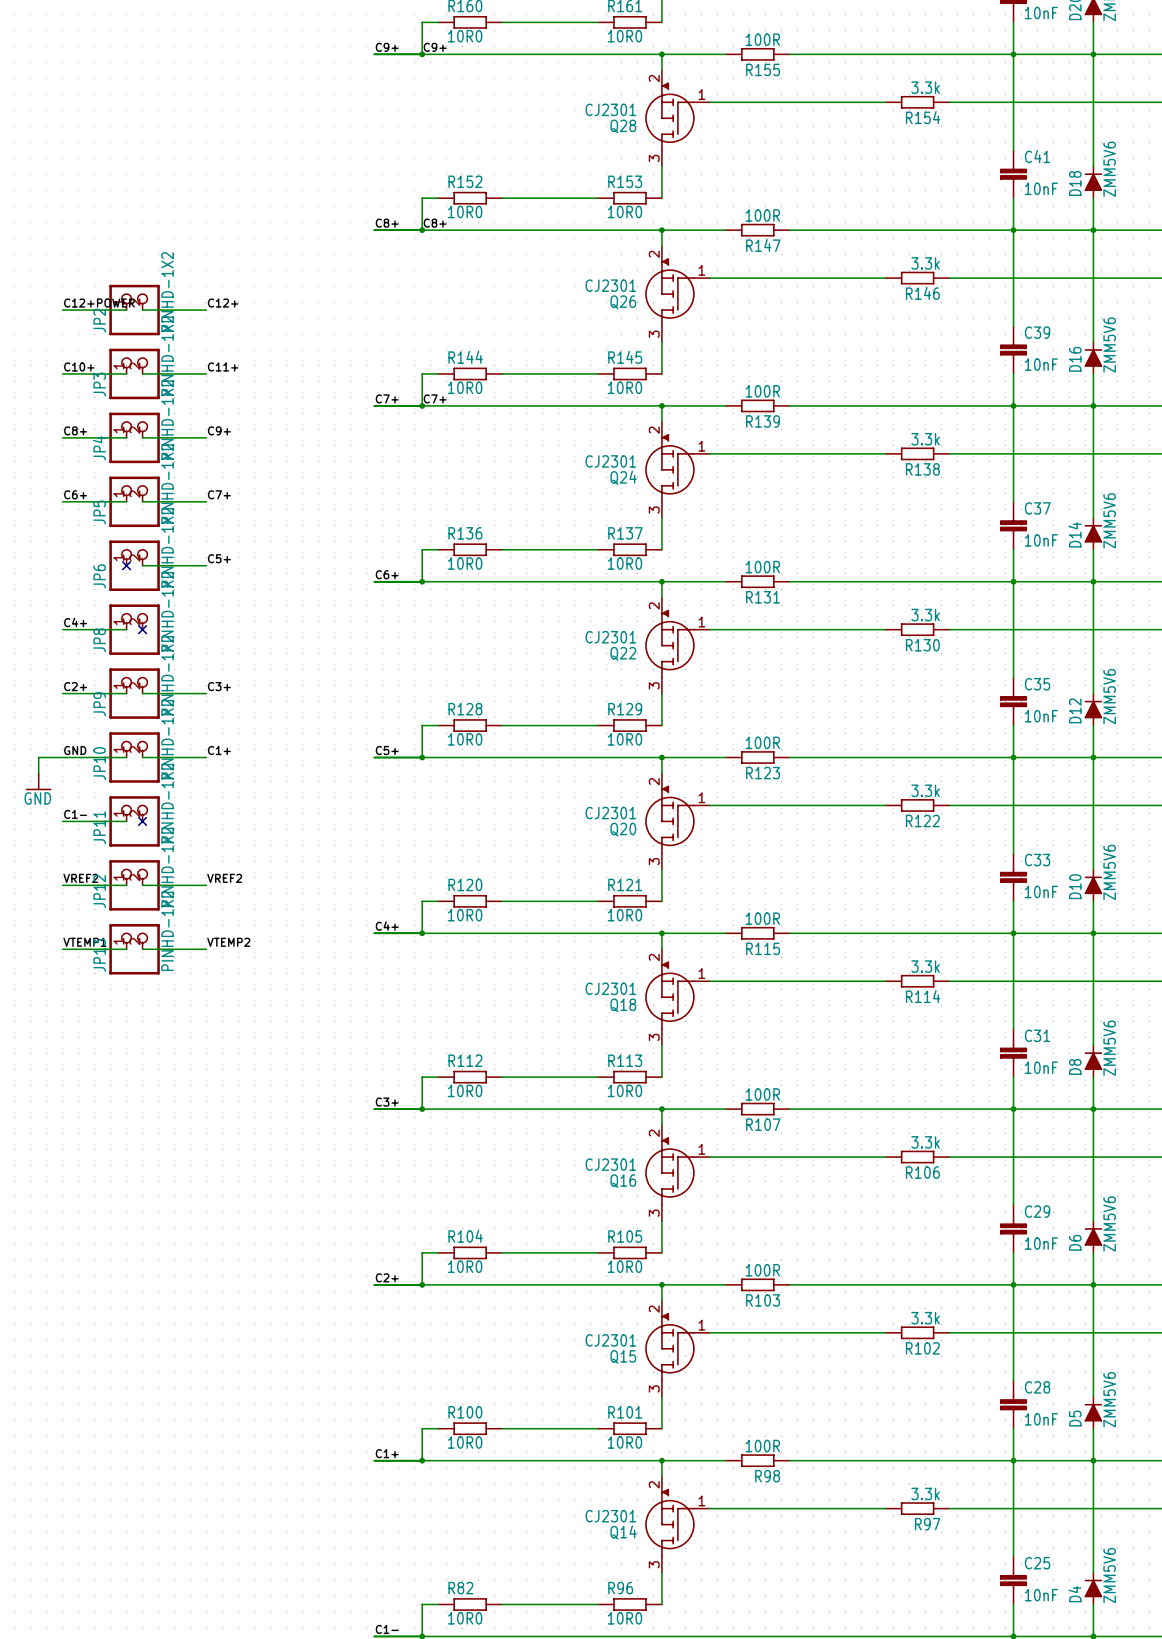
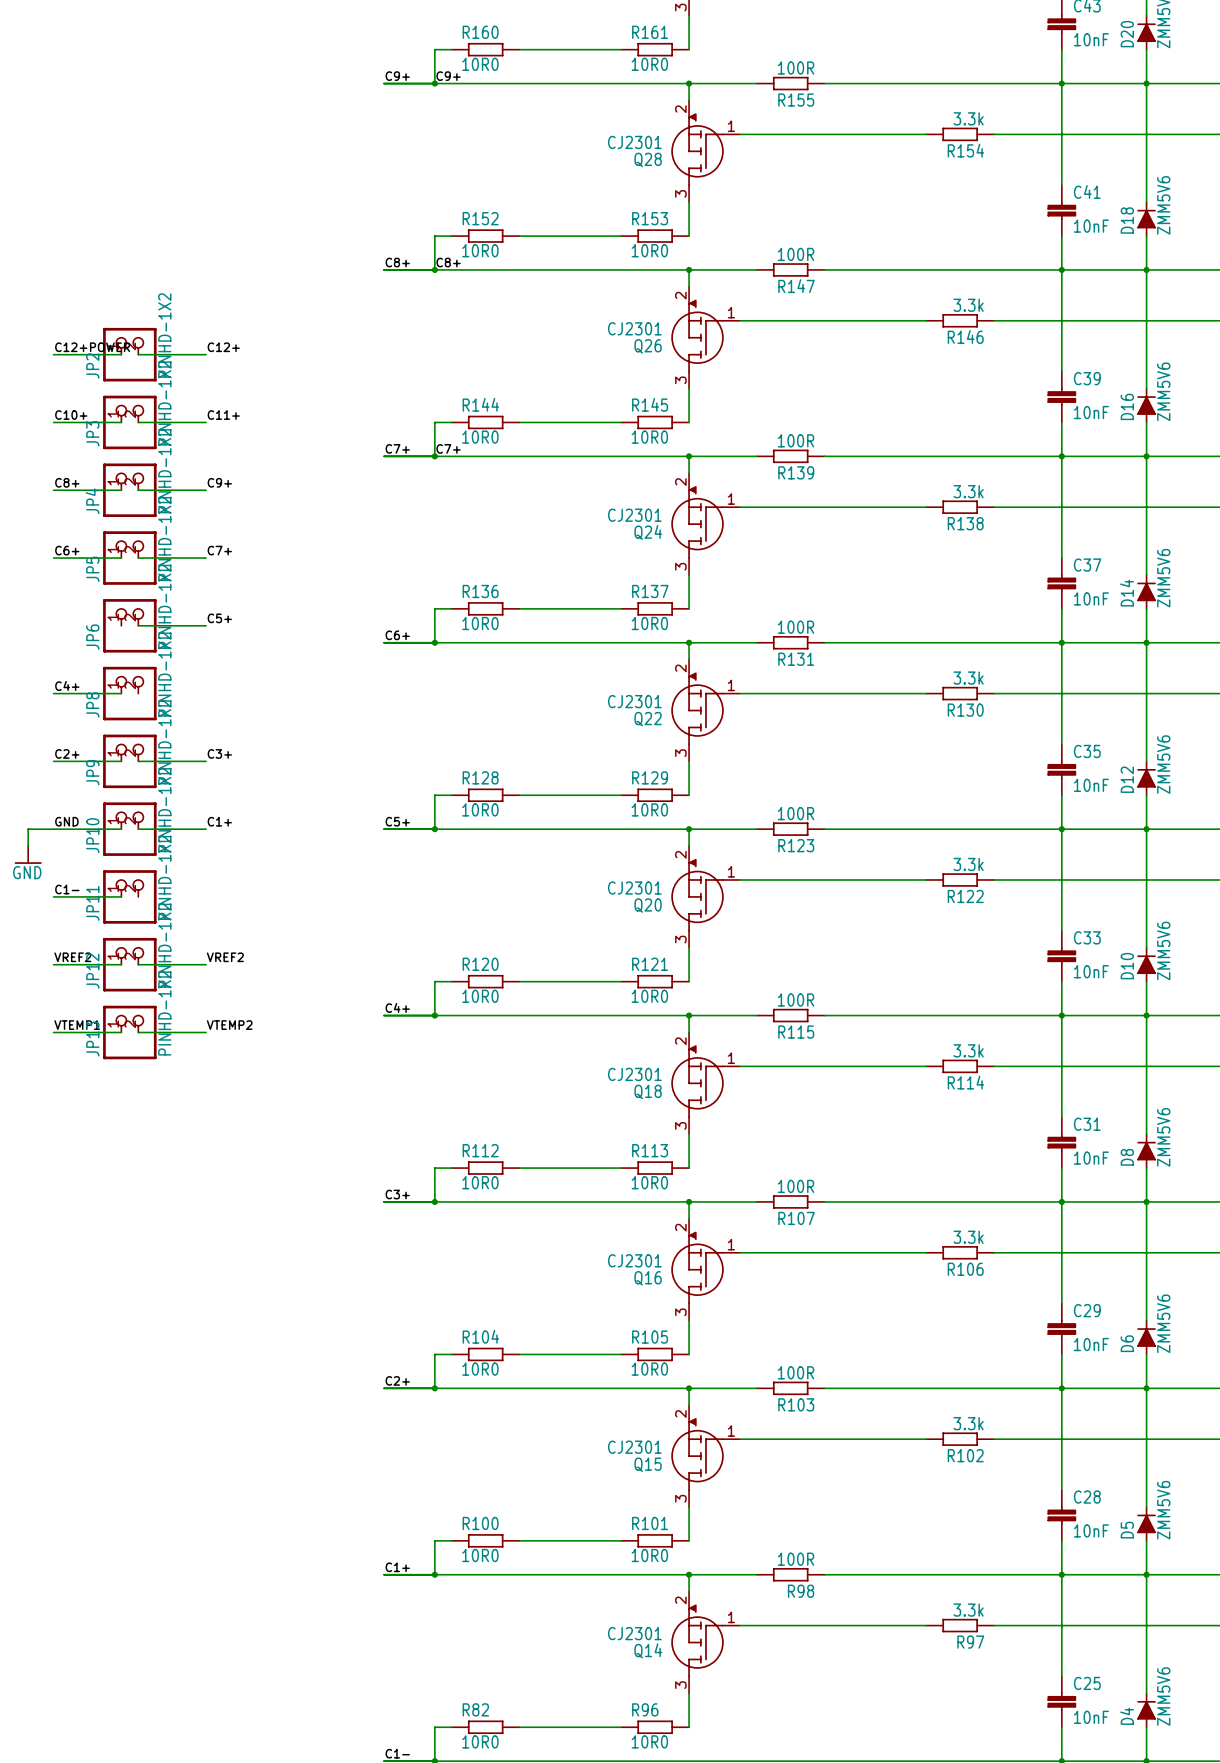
no-connect mark: (126, 565) -> none
no-connect mark: (142, 629) -> none
no-connect mark: (142, 821) -> none

